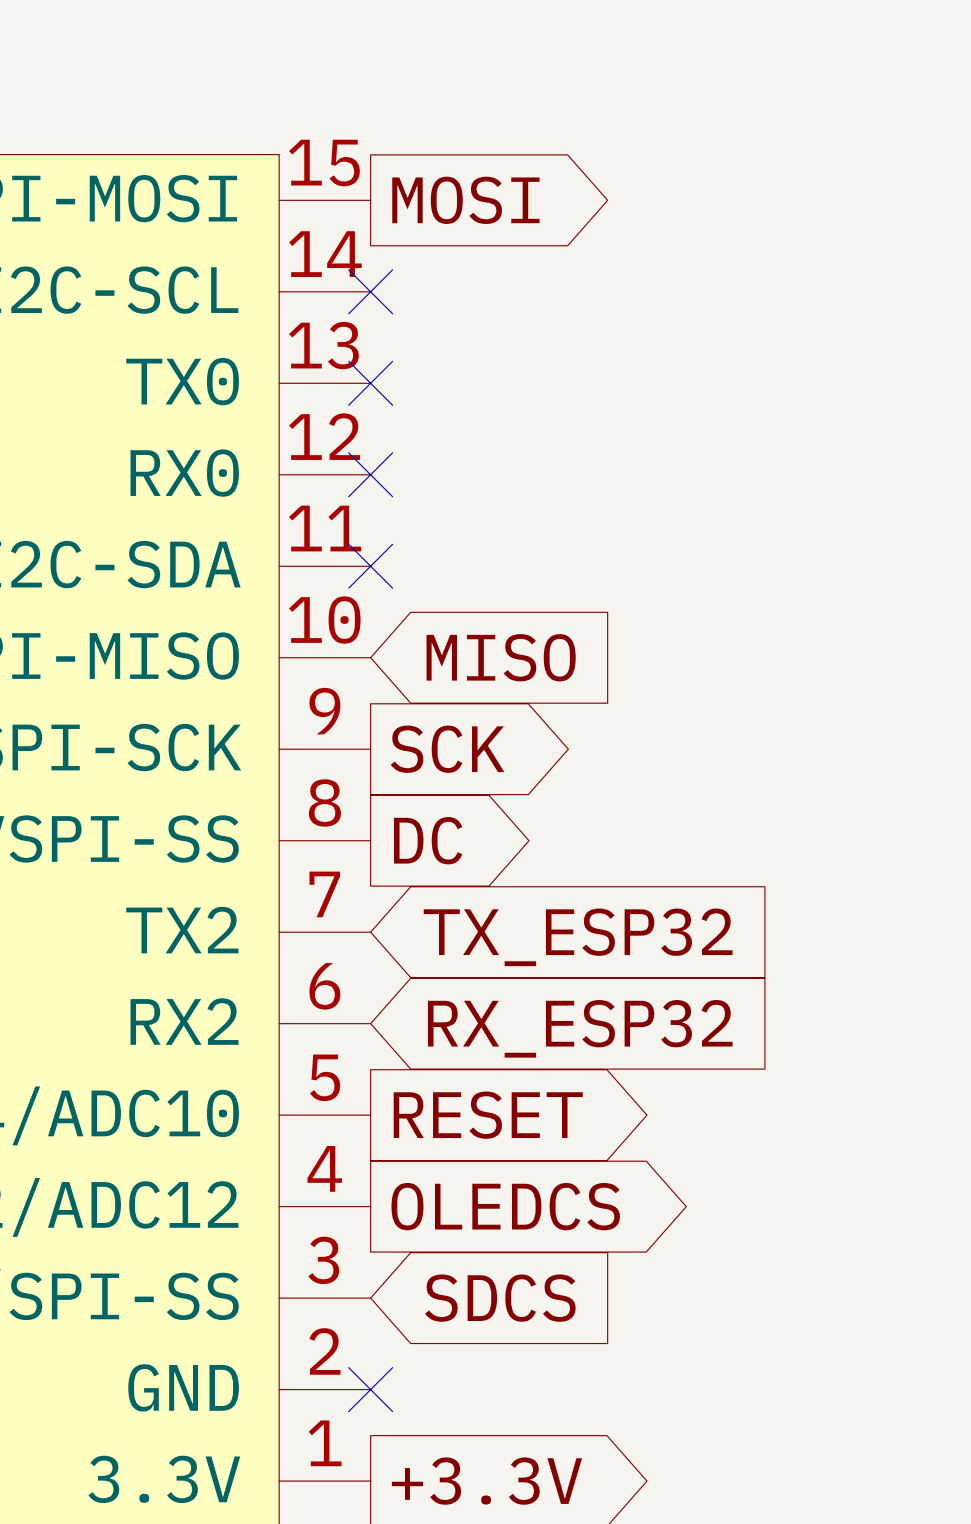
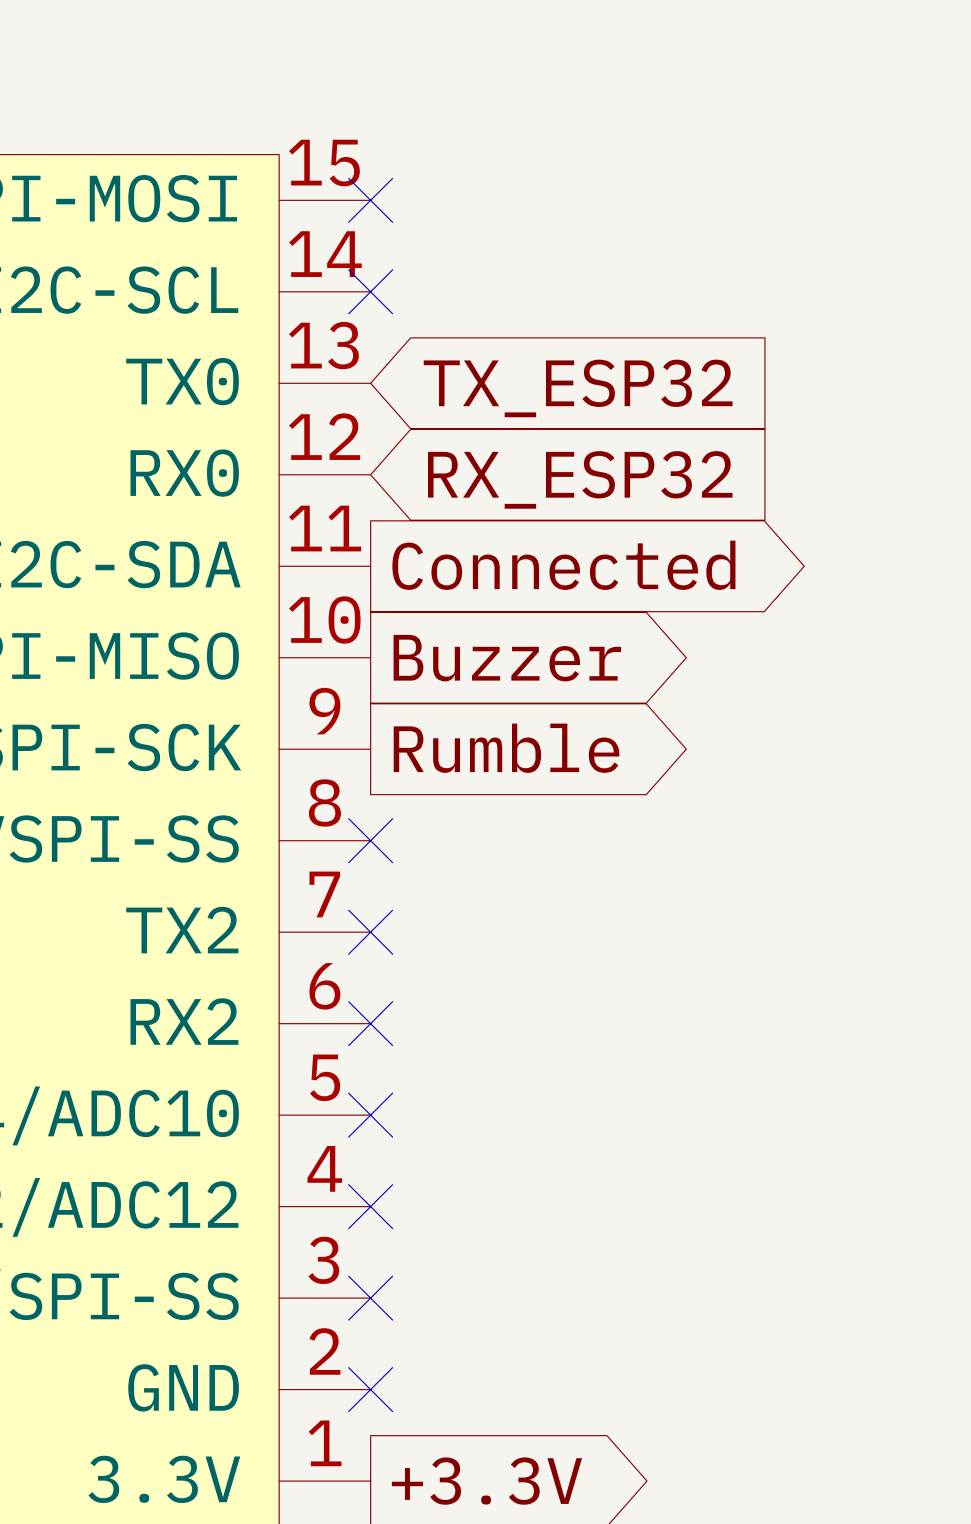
no-connect mark: none -> (370, 200)
global label: MOSI (465, 200) -> none
no-connect mark: (370, 383) -> none
no-connect mark: (370, 474) -> none
global label: none -> Connected (563, 565)
no-connect mark: (370, 566) -> none
global label shape: input (501, 657) -> output (507, 658)
global label: MISO (501, 657) -> Buzzer (507, 658)
global label: SCK (447, 749) -> Rumble (506, 748)
no-connect mark: none -> (370, 840)
global label: DC (428, 840) -> none
no-connect mark: none -> (370, 932)
global label position: TX_ESP32 (578, 937) -> TX_ESP32 (578, 388)
no-connect mark: none -> (370, 1023)
global label position: RX_ESP32 (580, 1028) -> RX_ESP32 (580, 479)
no-connect mark: none -> (370, 1115)
global label: RESET (488, 1115) -> none
no-connect mark: none -> (370, 1206)
global label: OLEDCS (505, 1206) -> none
no-connect mark: none -> (370, 1298)
global label: SDCS (500, 1298) -> none

